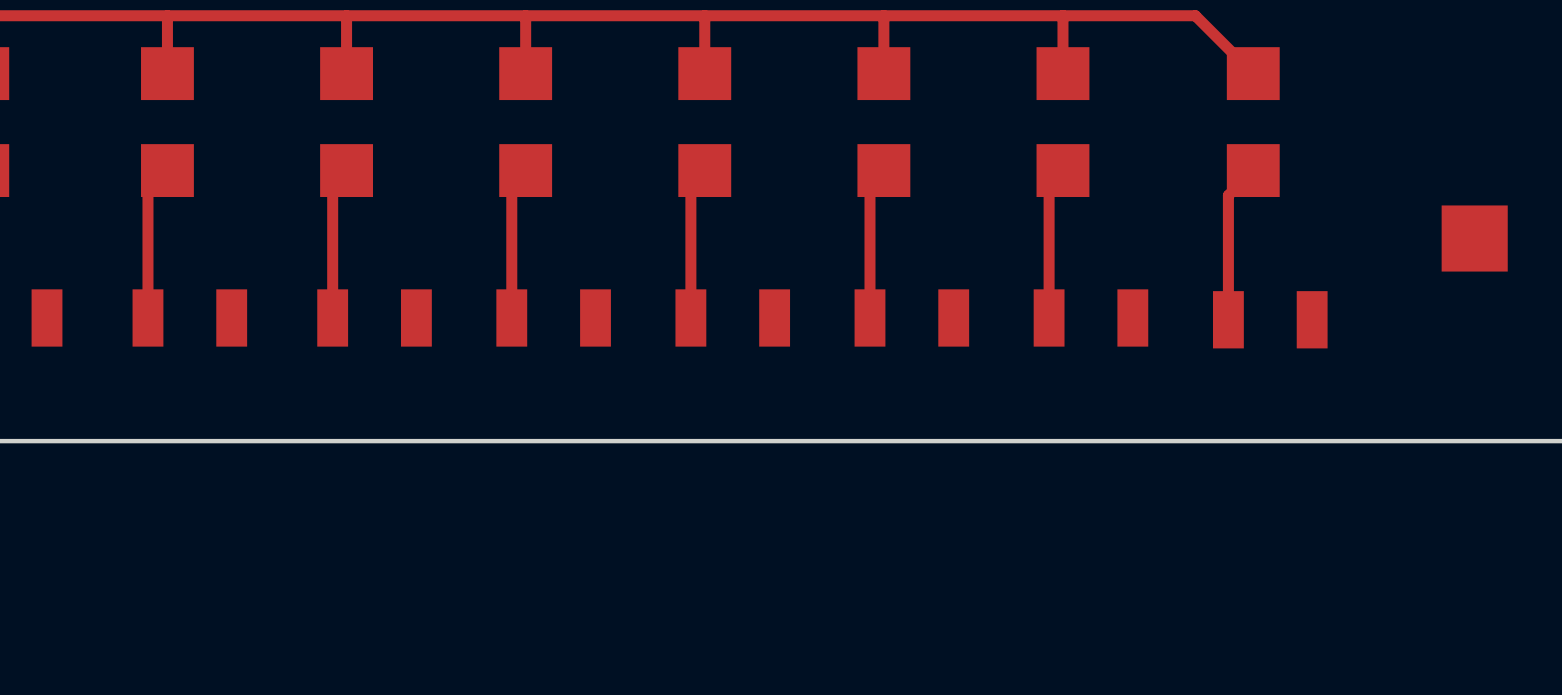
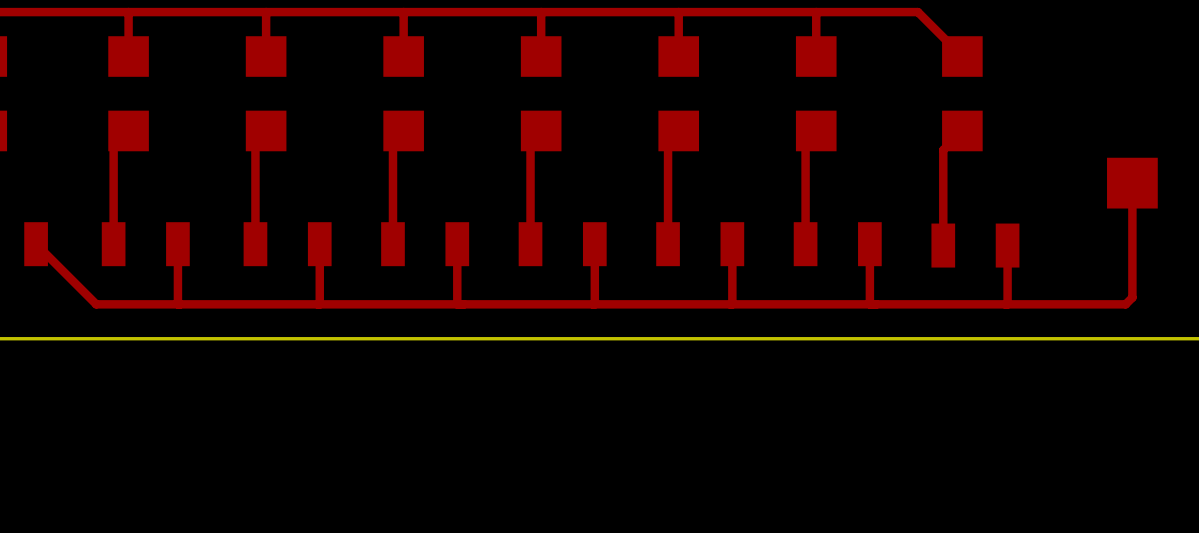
top track: none -> (1132, 183) (1132, 297) (1125, 304) (96, 304) (36, 244)
top track: none -> (177, 244) (177, 304)
top track: none -> (319, 244) (319, 304)
top track: none -> (457, 244) (457, 304)
top track: none -> (594, 244) (594, 304)
top track: none -> (732, 244) (732, 304)
top track: none -> (869, 244) (869, 304)
top track: none -> (1007, 245) (1007, 304)

